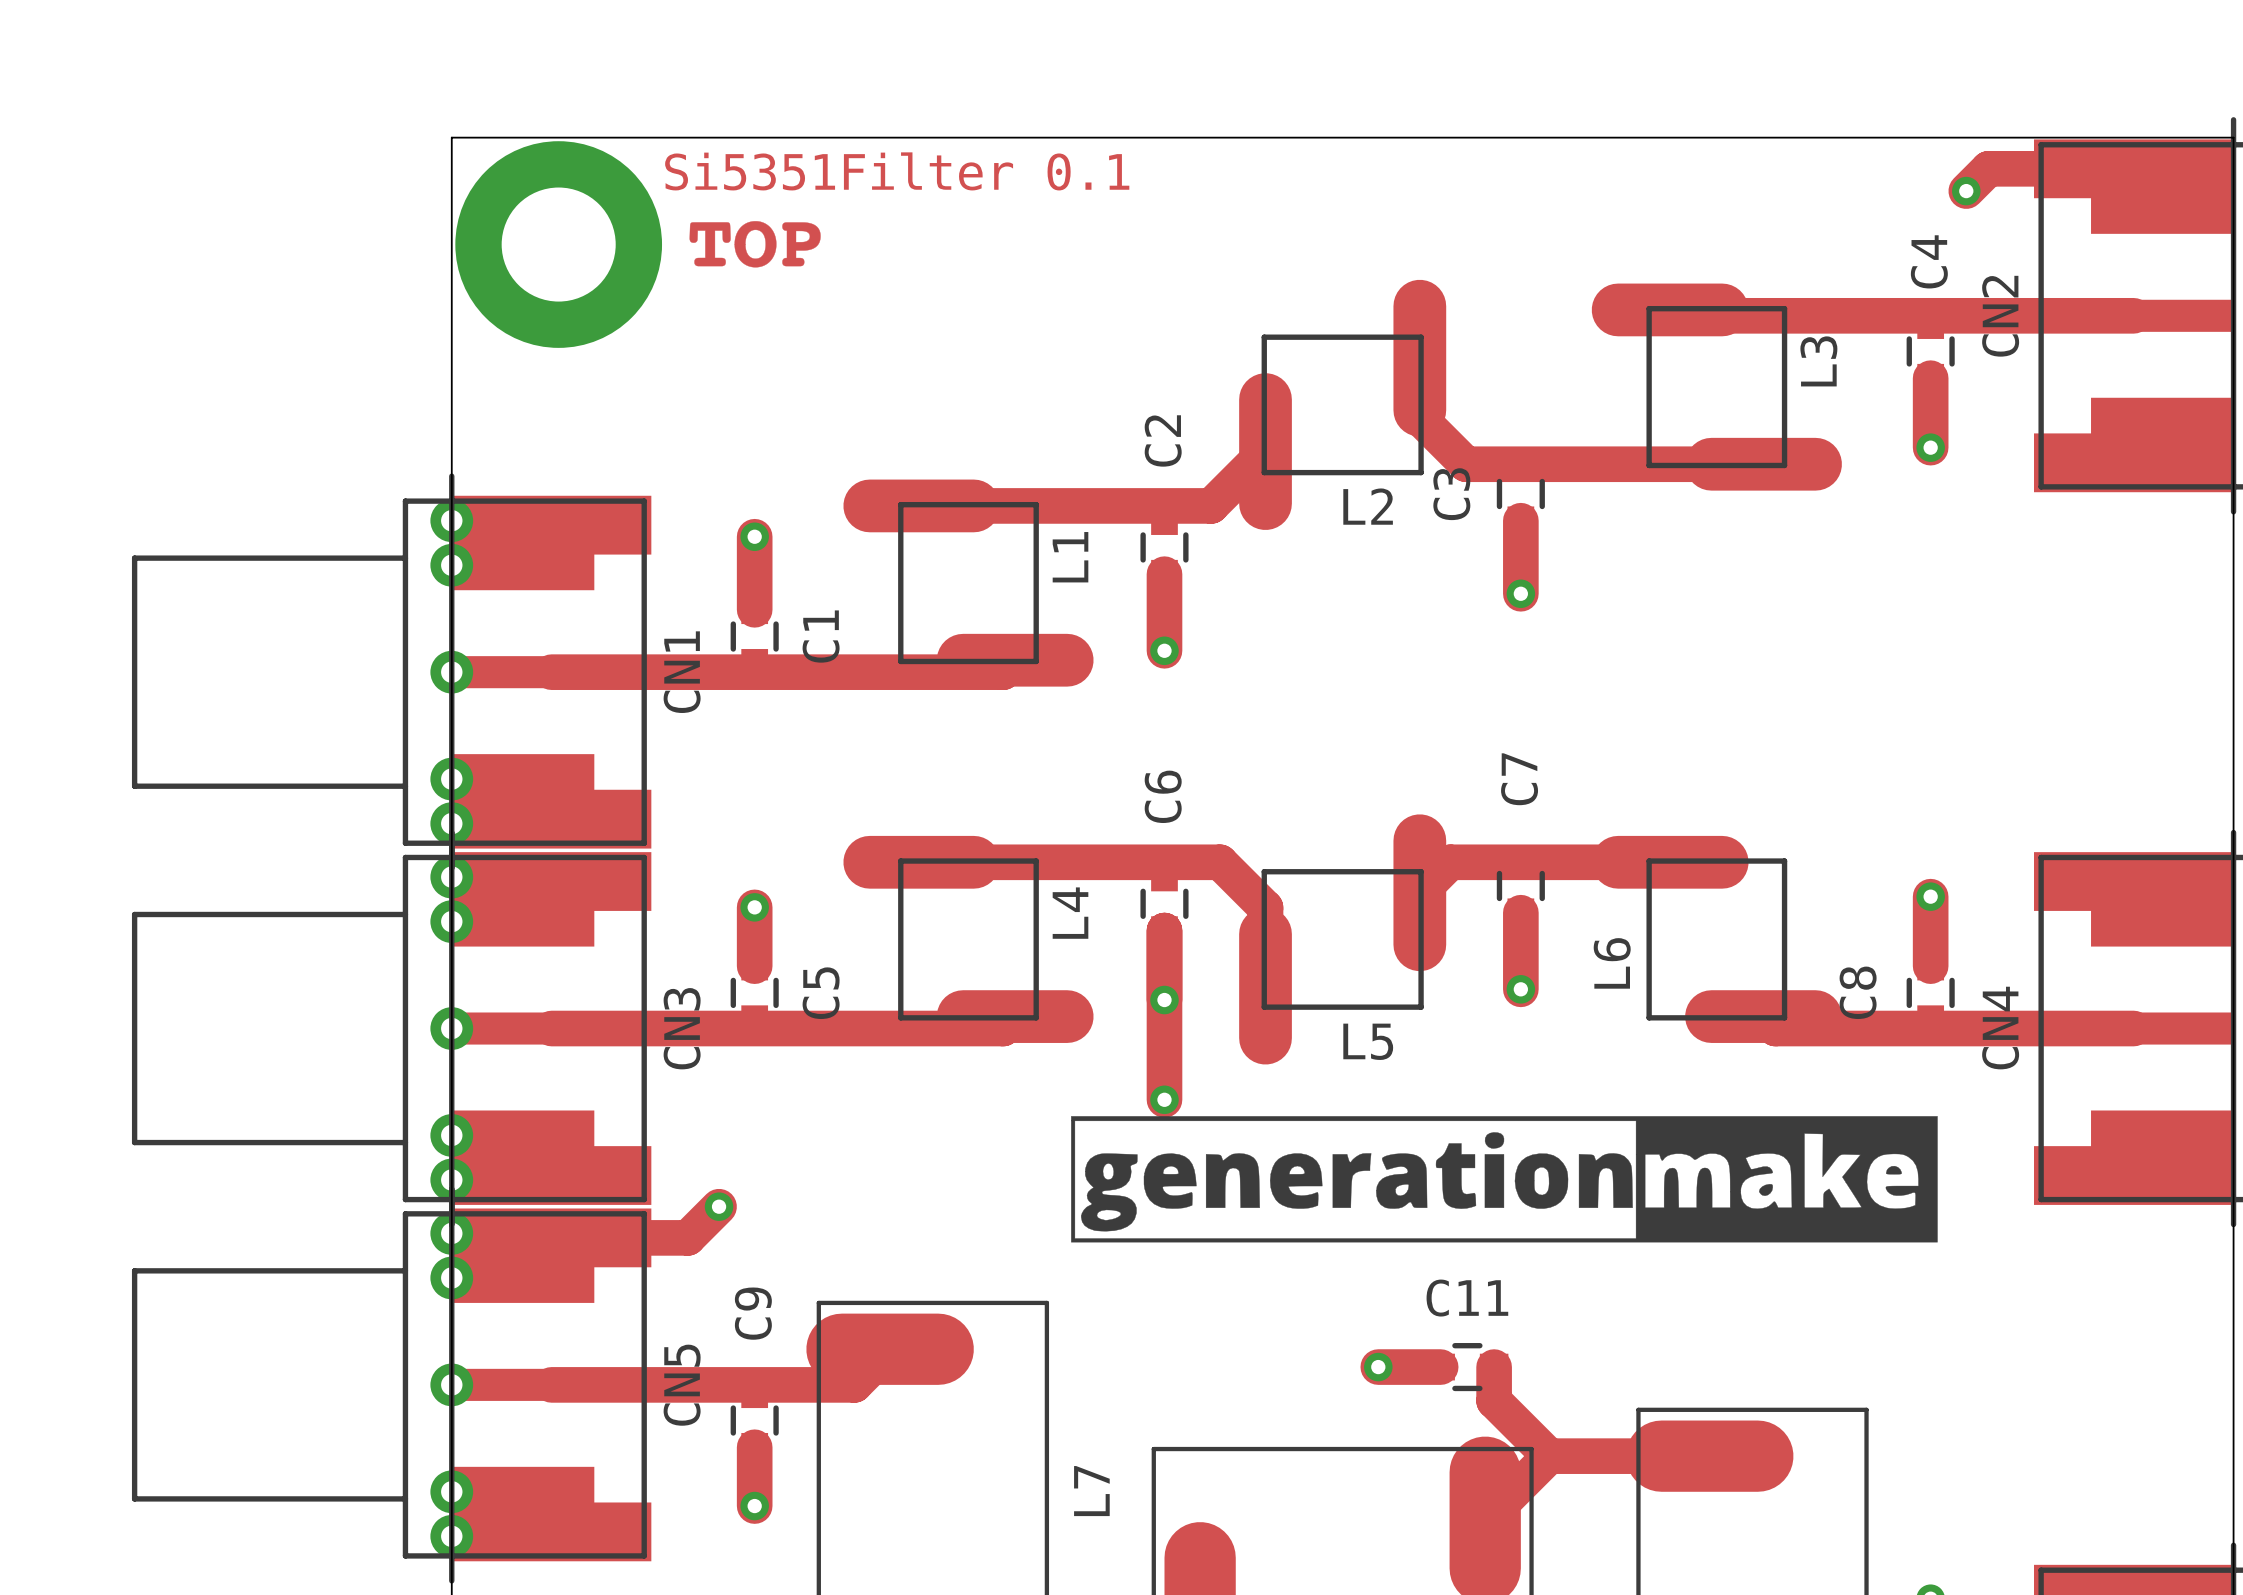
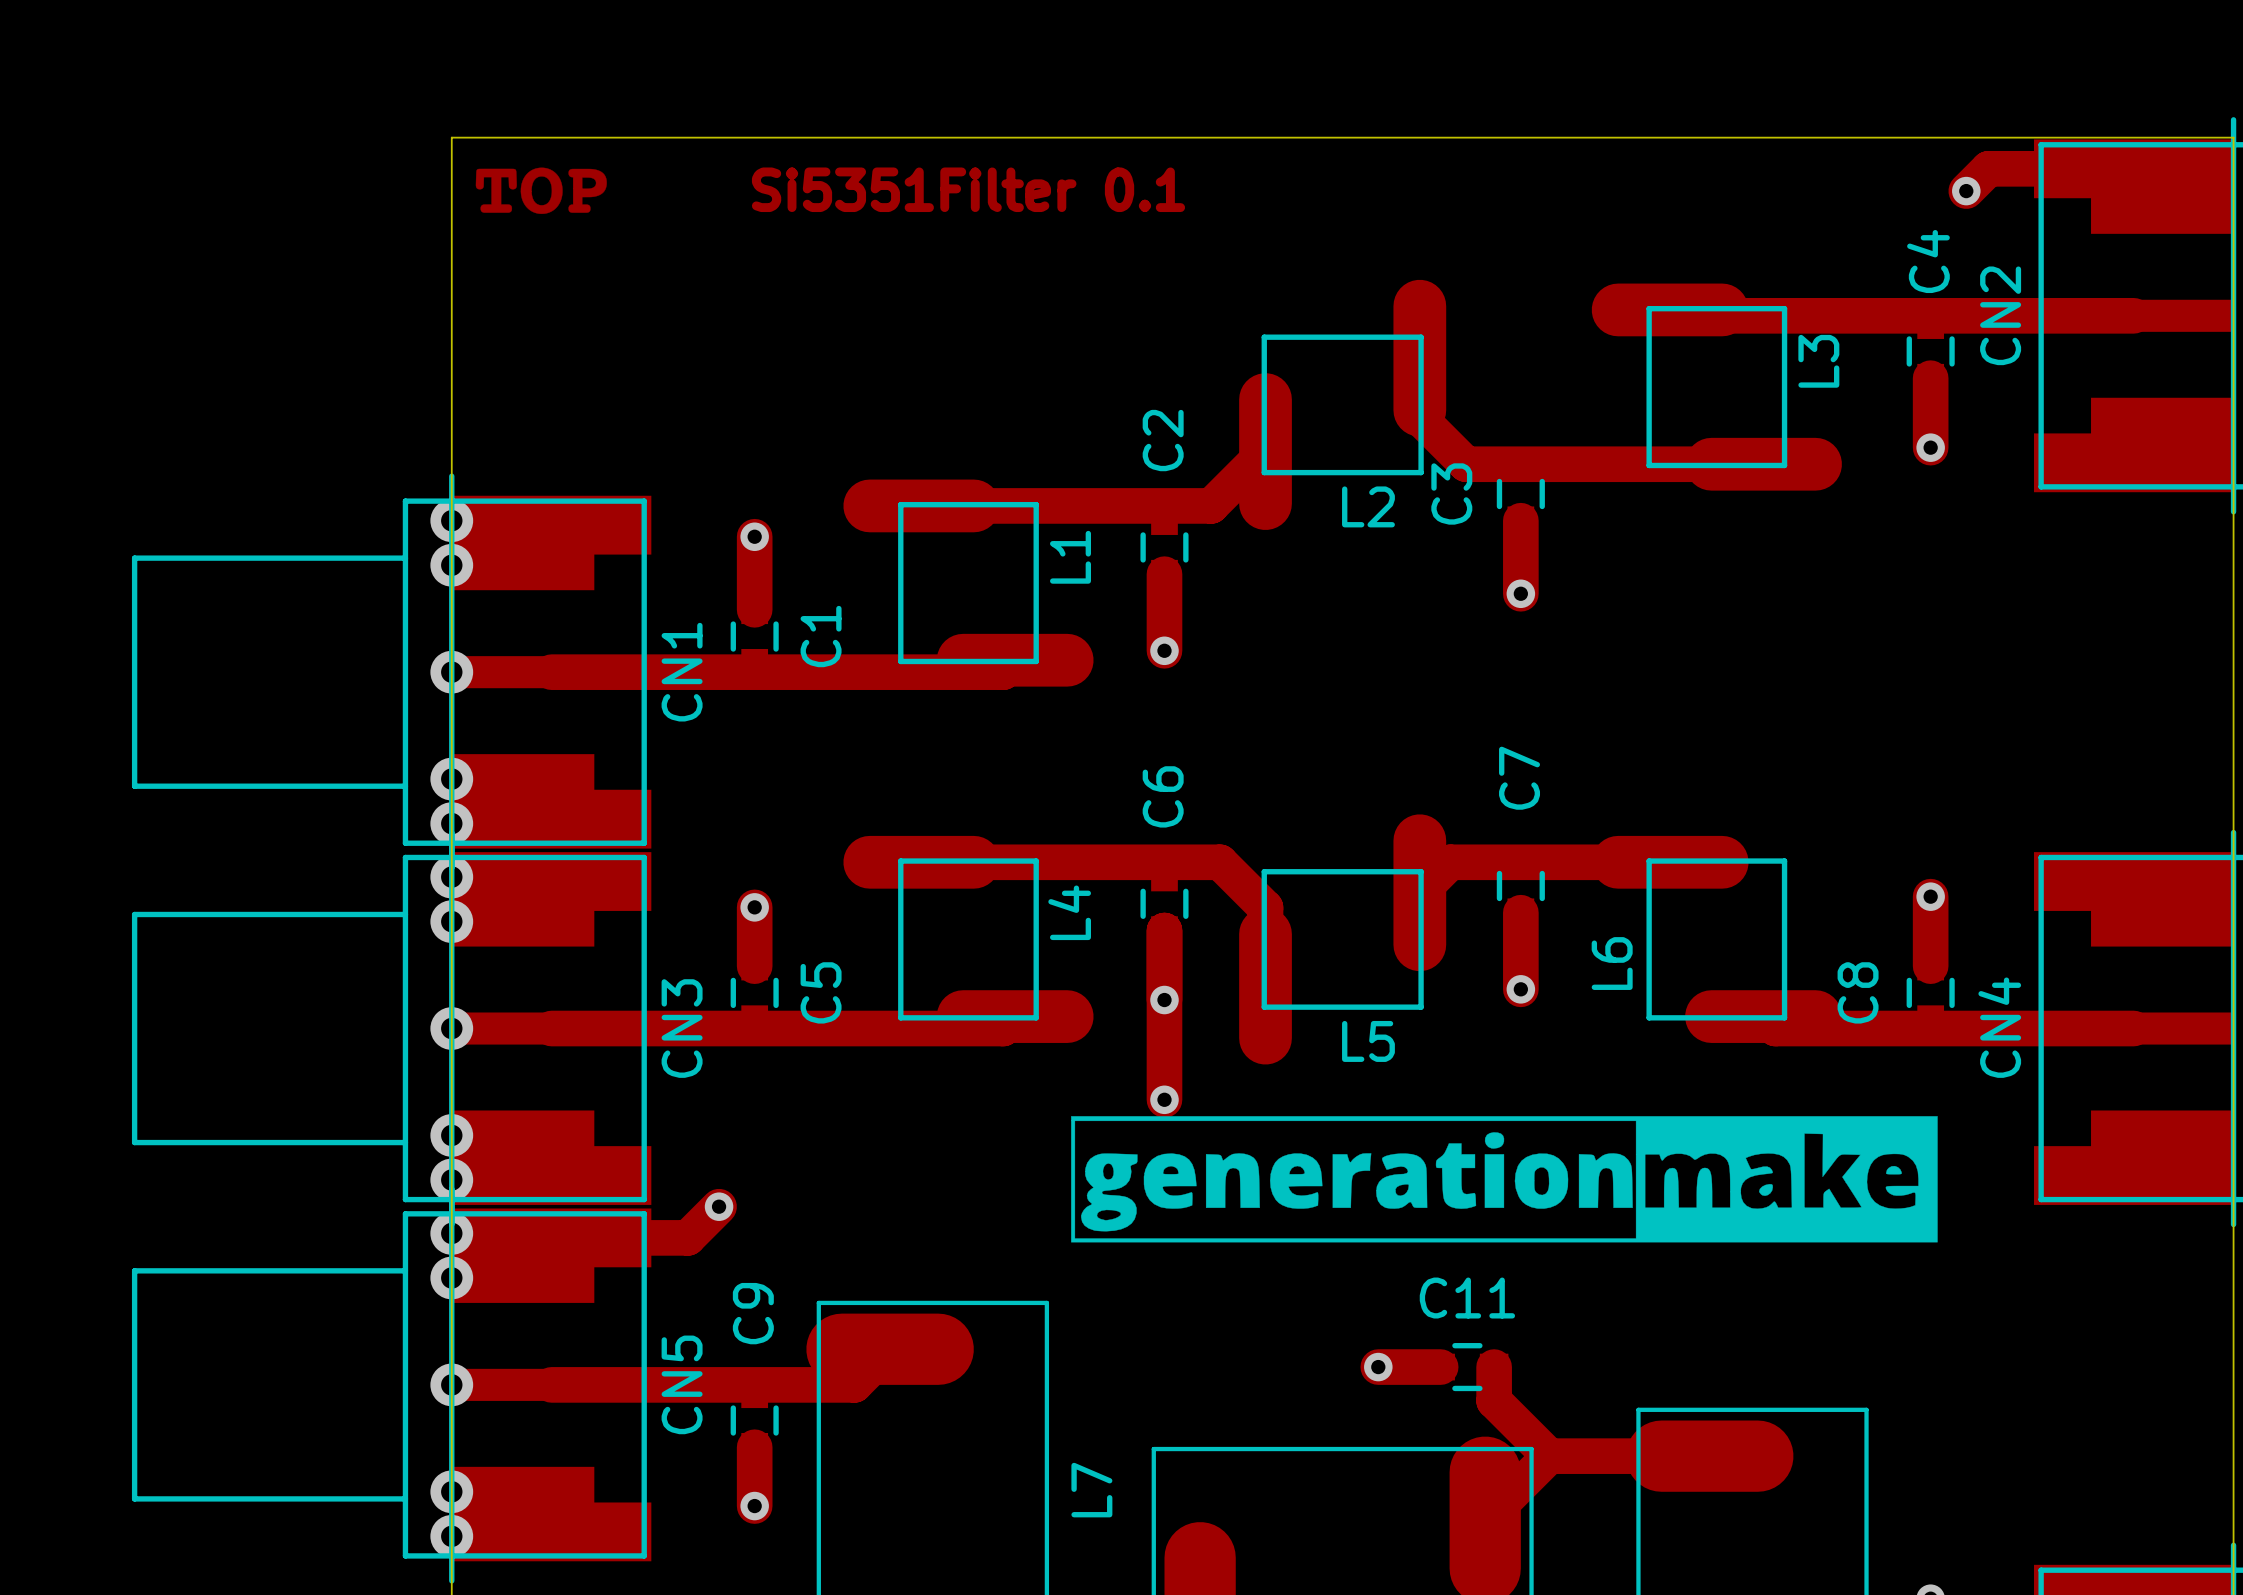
text position: Si5351Filter 0.1 (897, 171) -> Si5351Filter 0.1 (968, 189)
part: (558, 244) -> none
drawing position: (755, 244) -> (541, 190)

